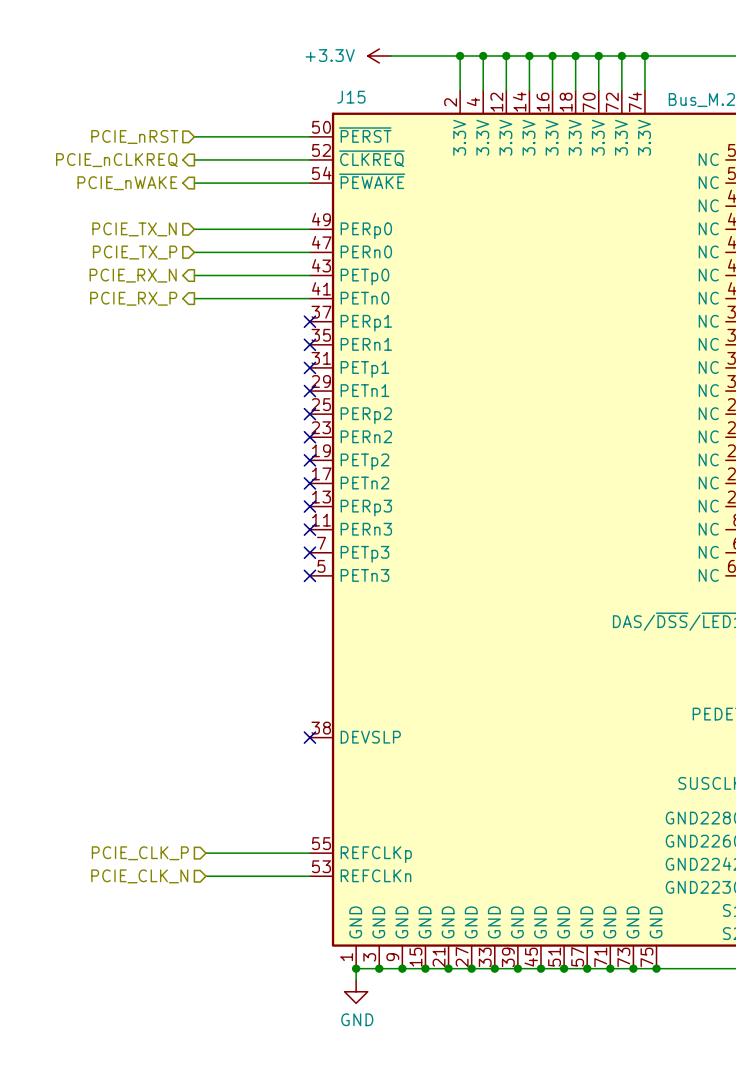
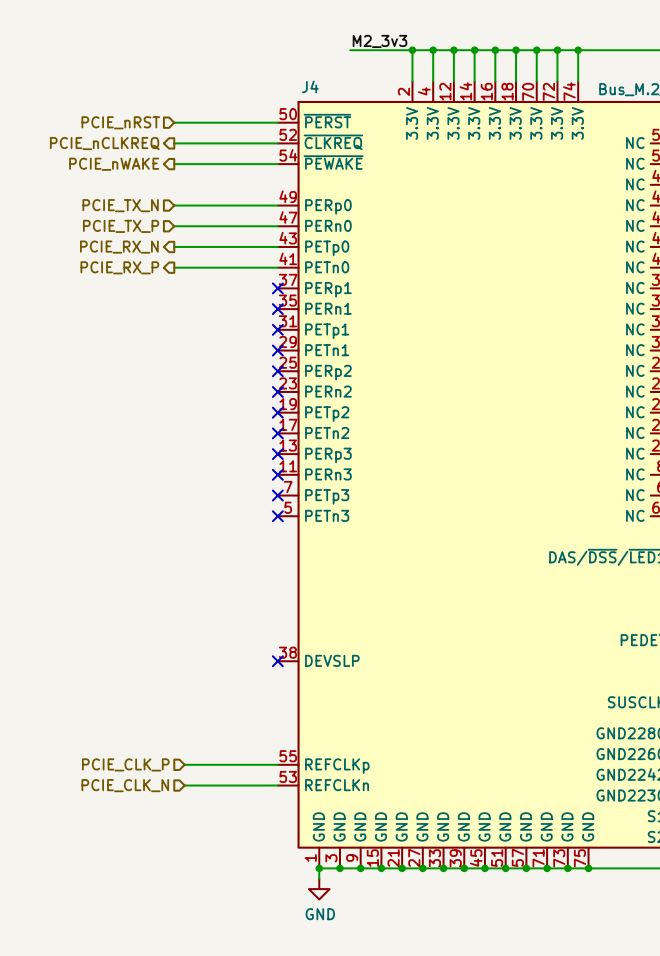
label: none -> M2_3v3 (380, 41)
power symbol: +3.3V (379, 55) -> none
J15 name: J15 (351, 97) -> J4 (310, 86)

